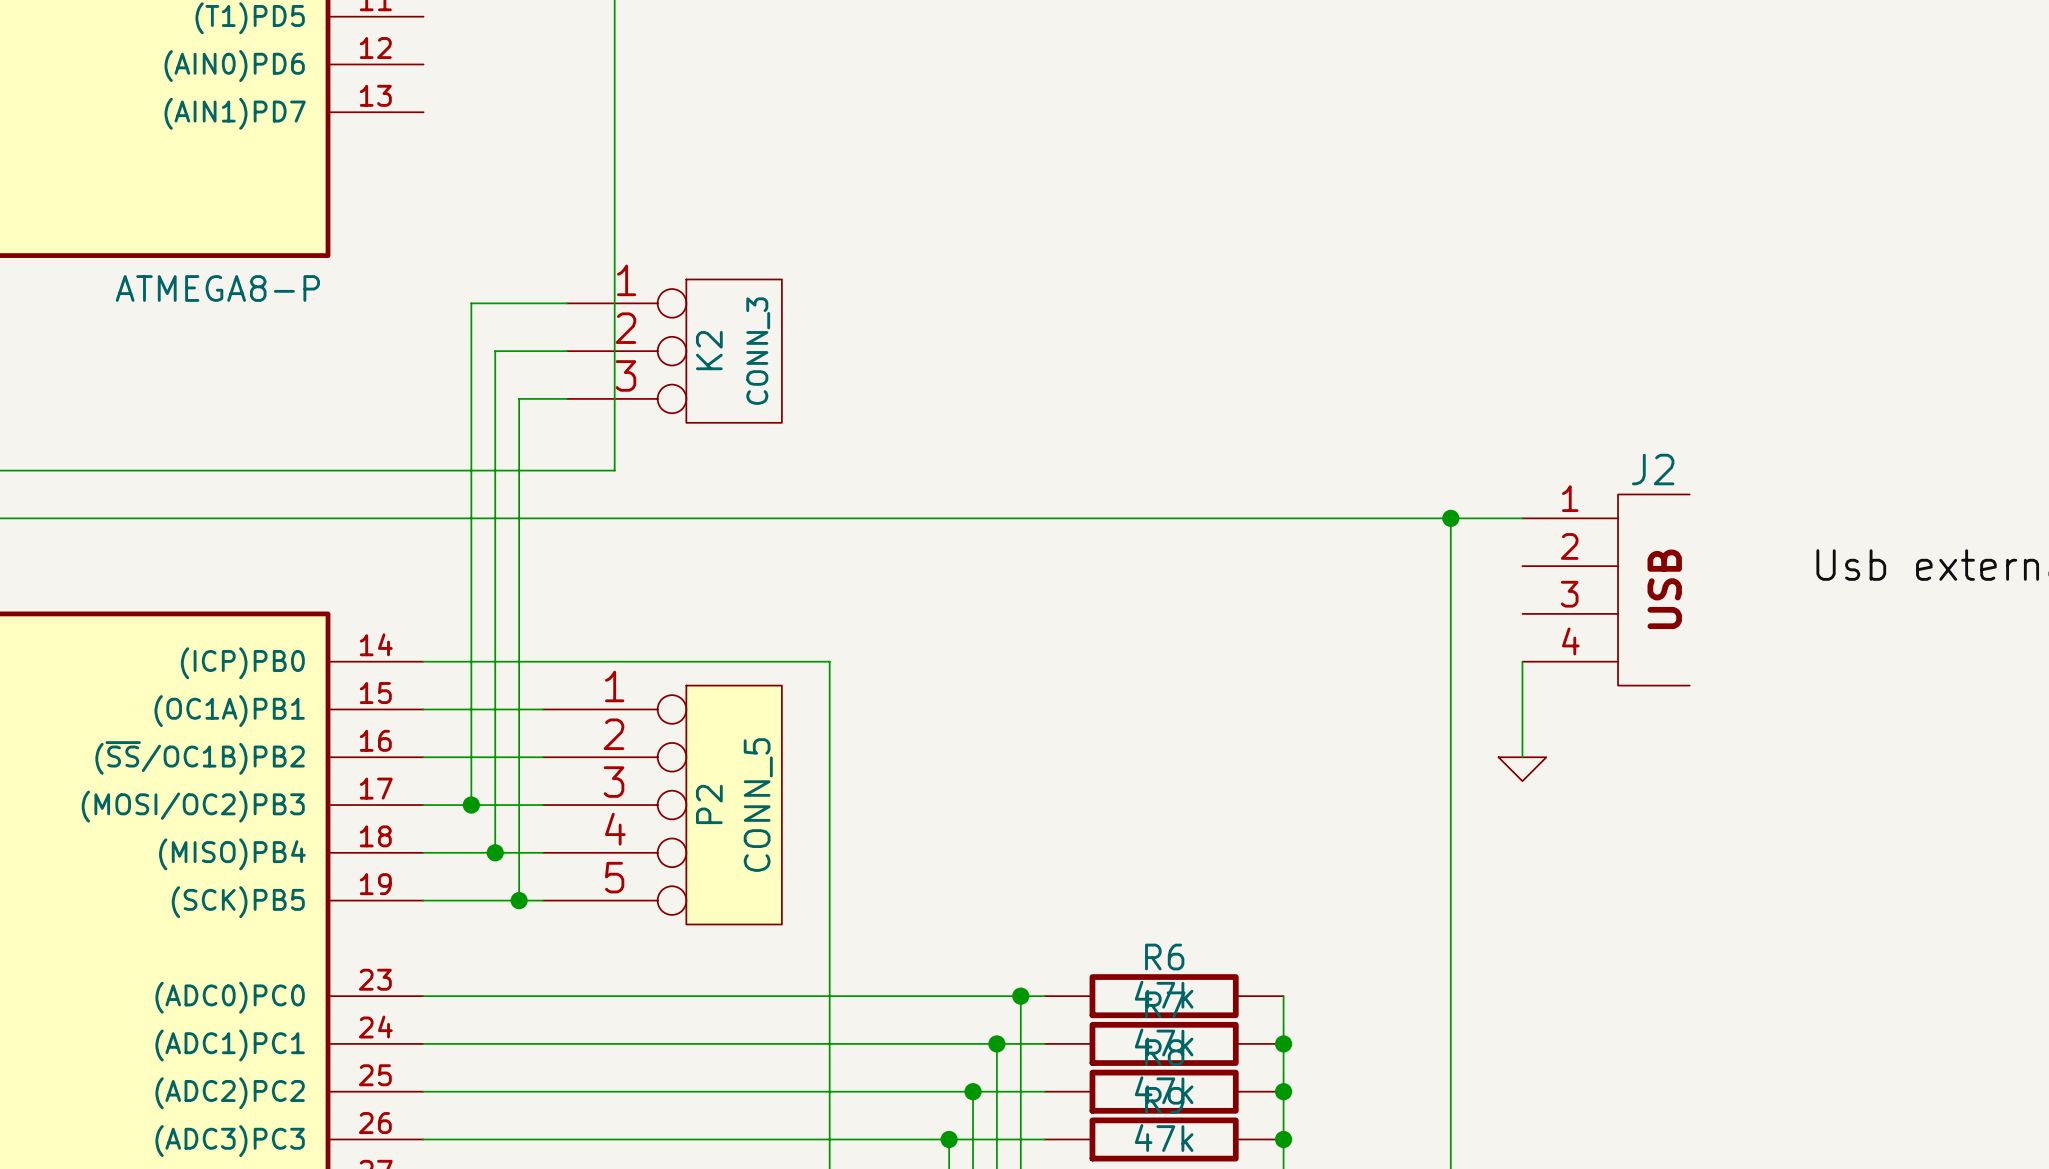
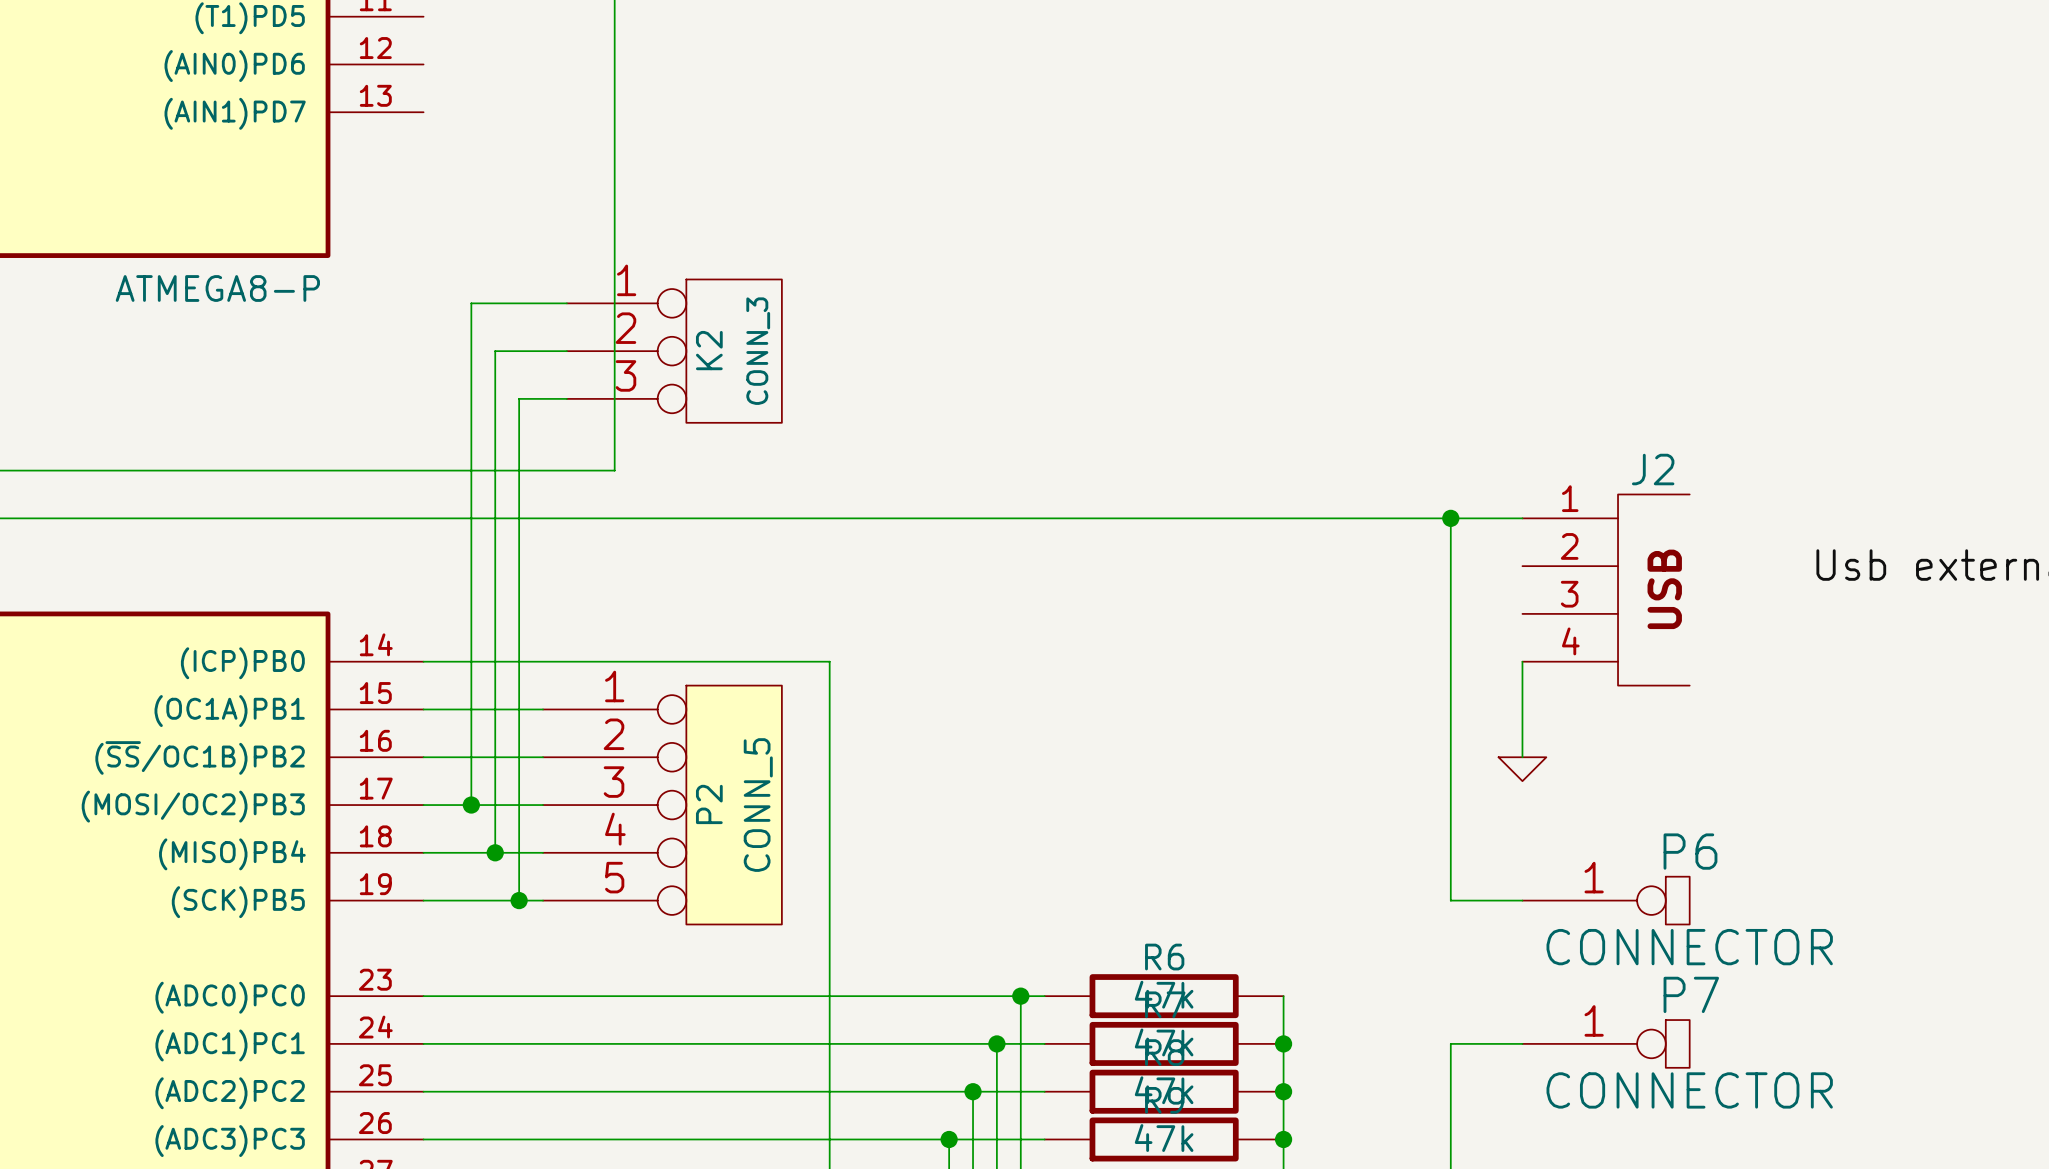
wire: (1450, 900) (1450, 1043) -> (1450, 900) (1522, 900)
P6: none -> CONNECTOR (1606, 900)
wire: none -> (1450, 1043) (1522, 1043)
P7: none -> CONNECTOR (1606, 1043)

